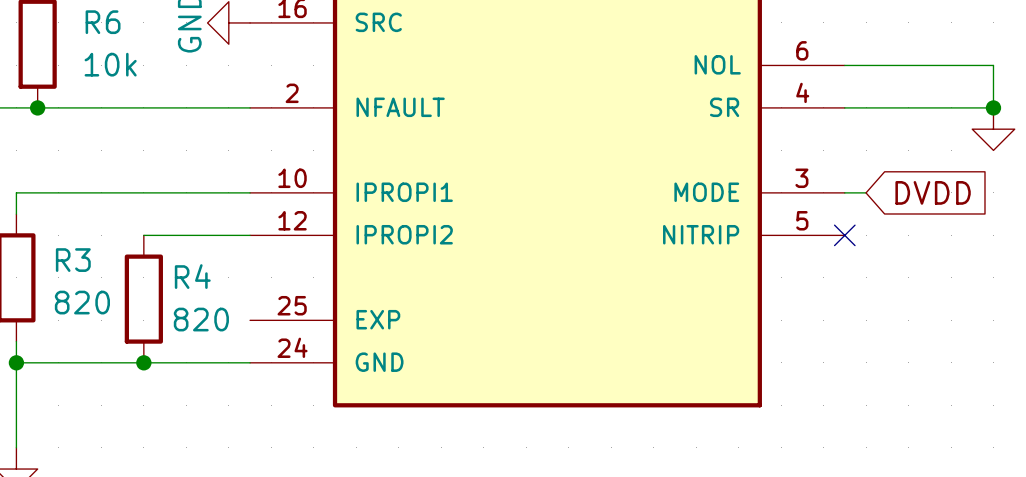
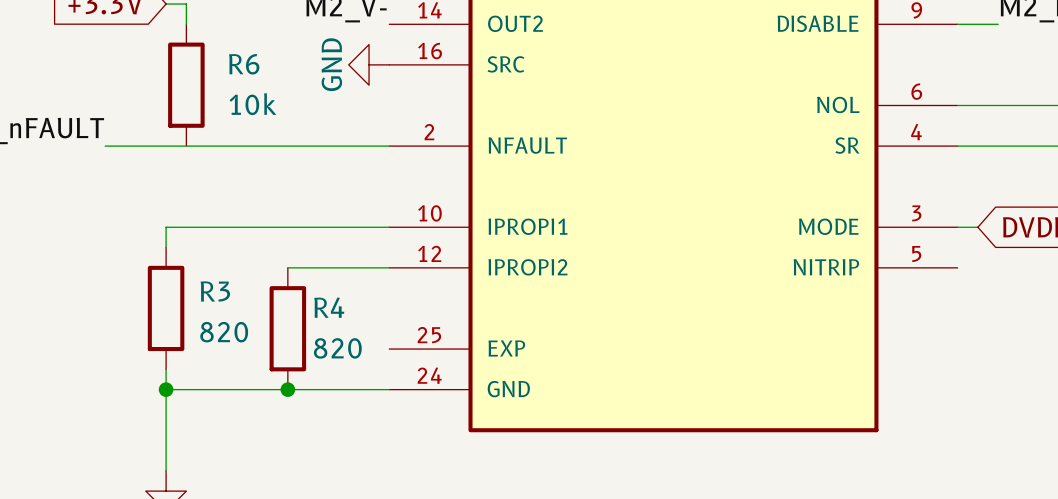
junction: (37, 107) -> none
no-connect mark: (844, 235) -> none

